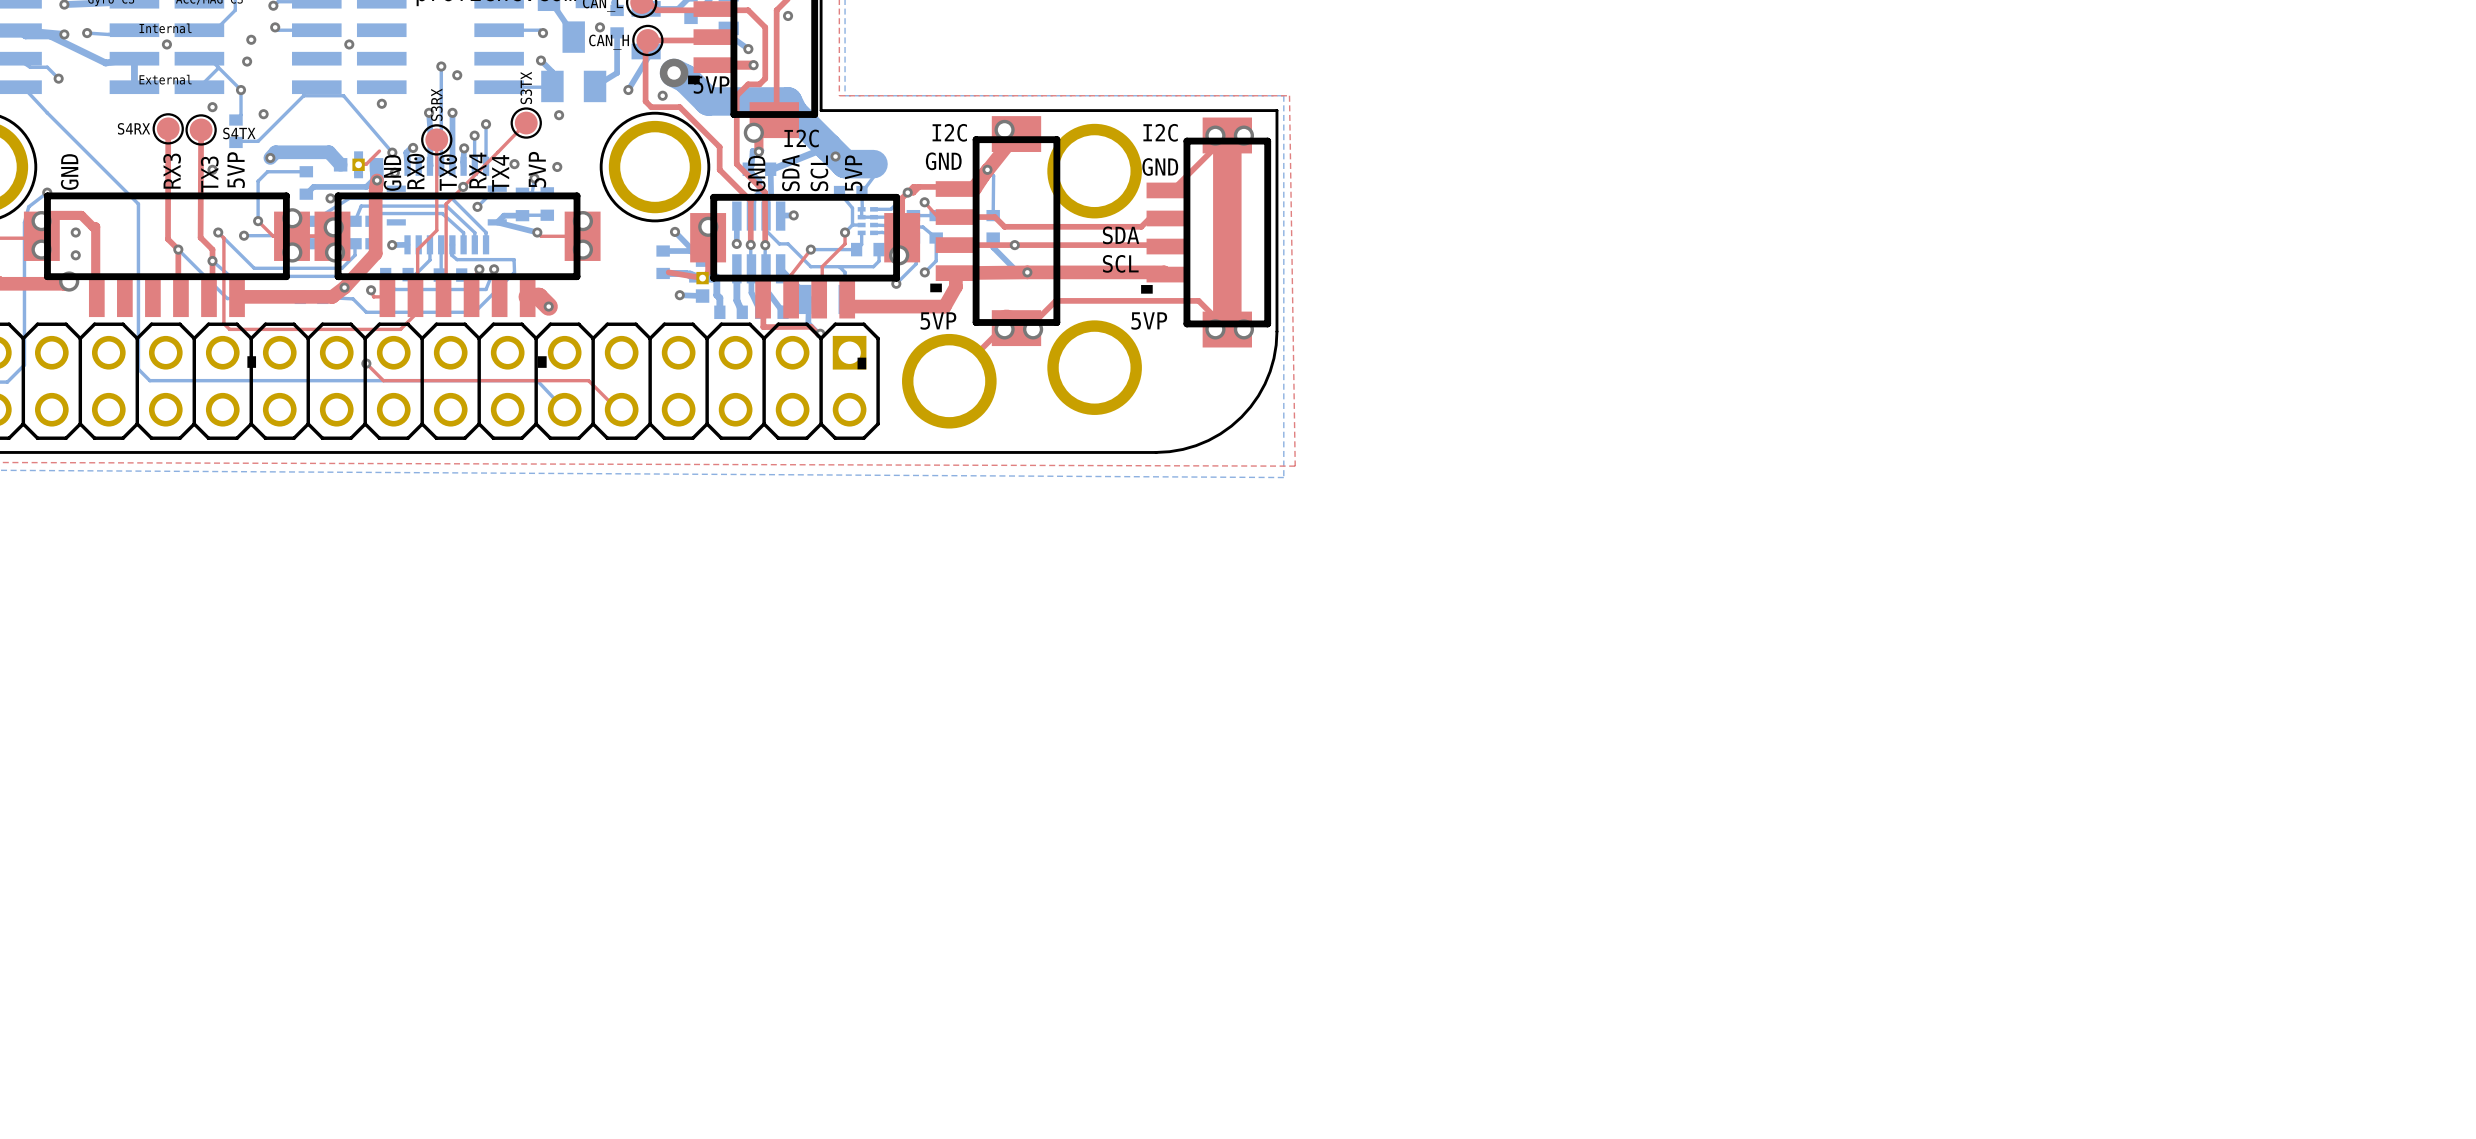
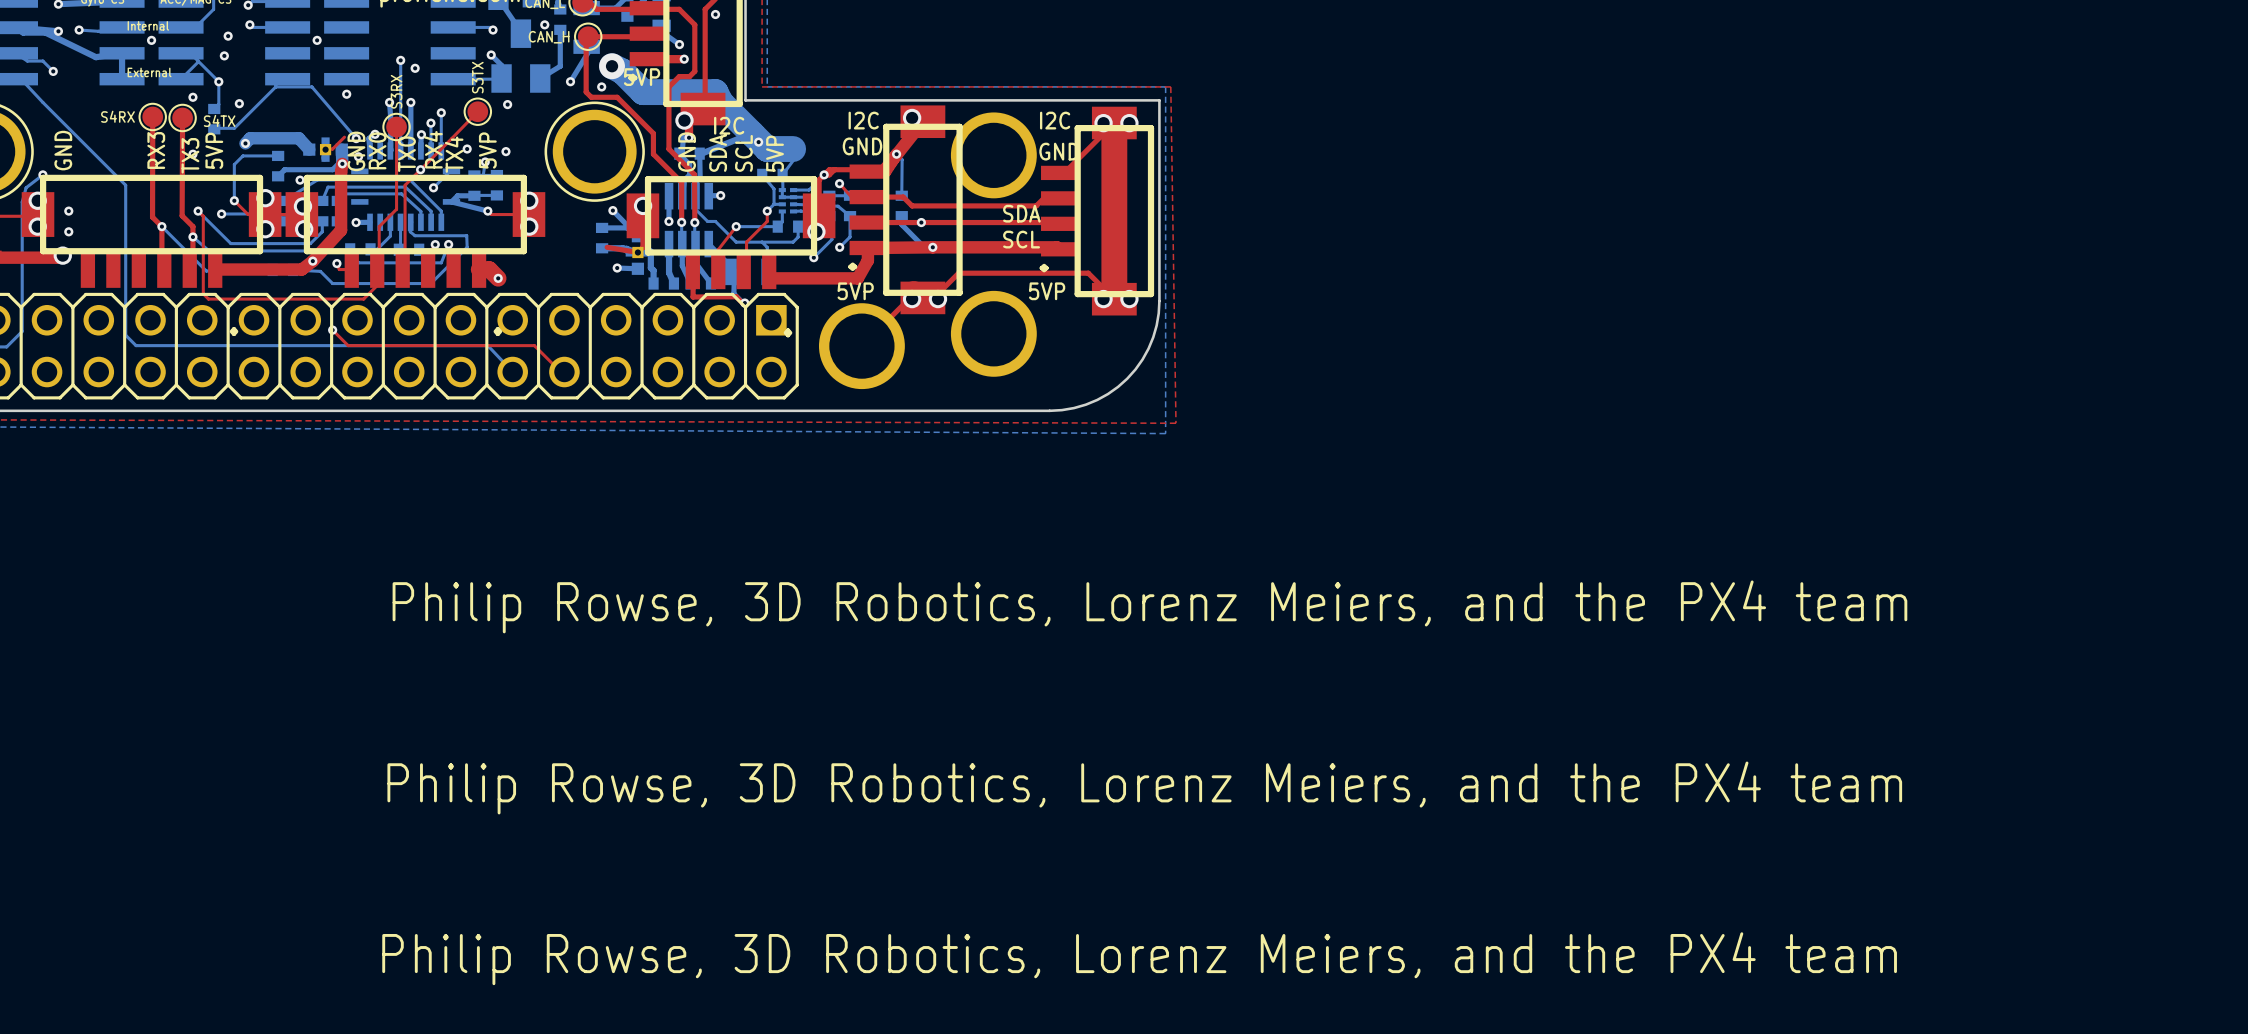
top track: (39, 238) (41, 249) (41, 221) (47, 215) (81, 215) (92, 226) (95, 226) (96, 296) -> none
text: none -> Philip Rowse, 3D Robotics, Lorenz Meiers, and the PX4 team (1149, 606)
text: none -> Philip Rowse, 3D Robotics, Lorenz Meiers, and the PX4 team (1144, 787)
text: none -> Philip Rowse, 3D Robotics, Lorenz Meiers, and the PX4 team (1139, 958)

